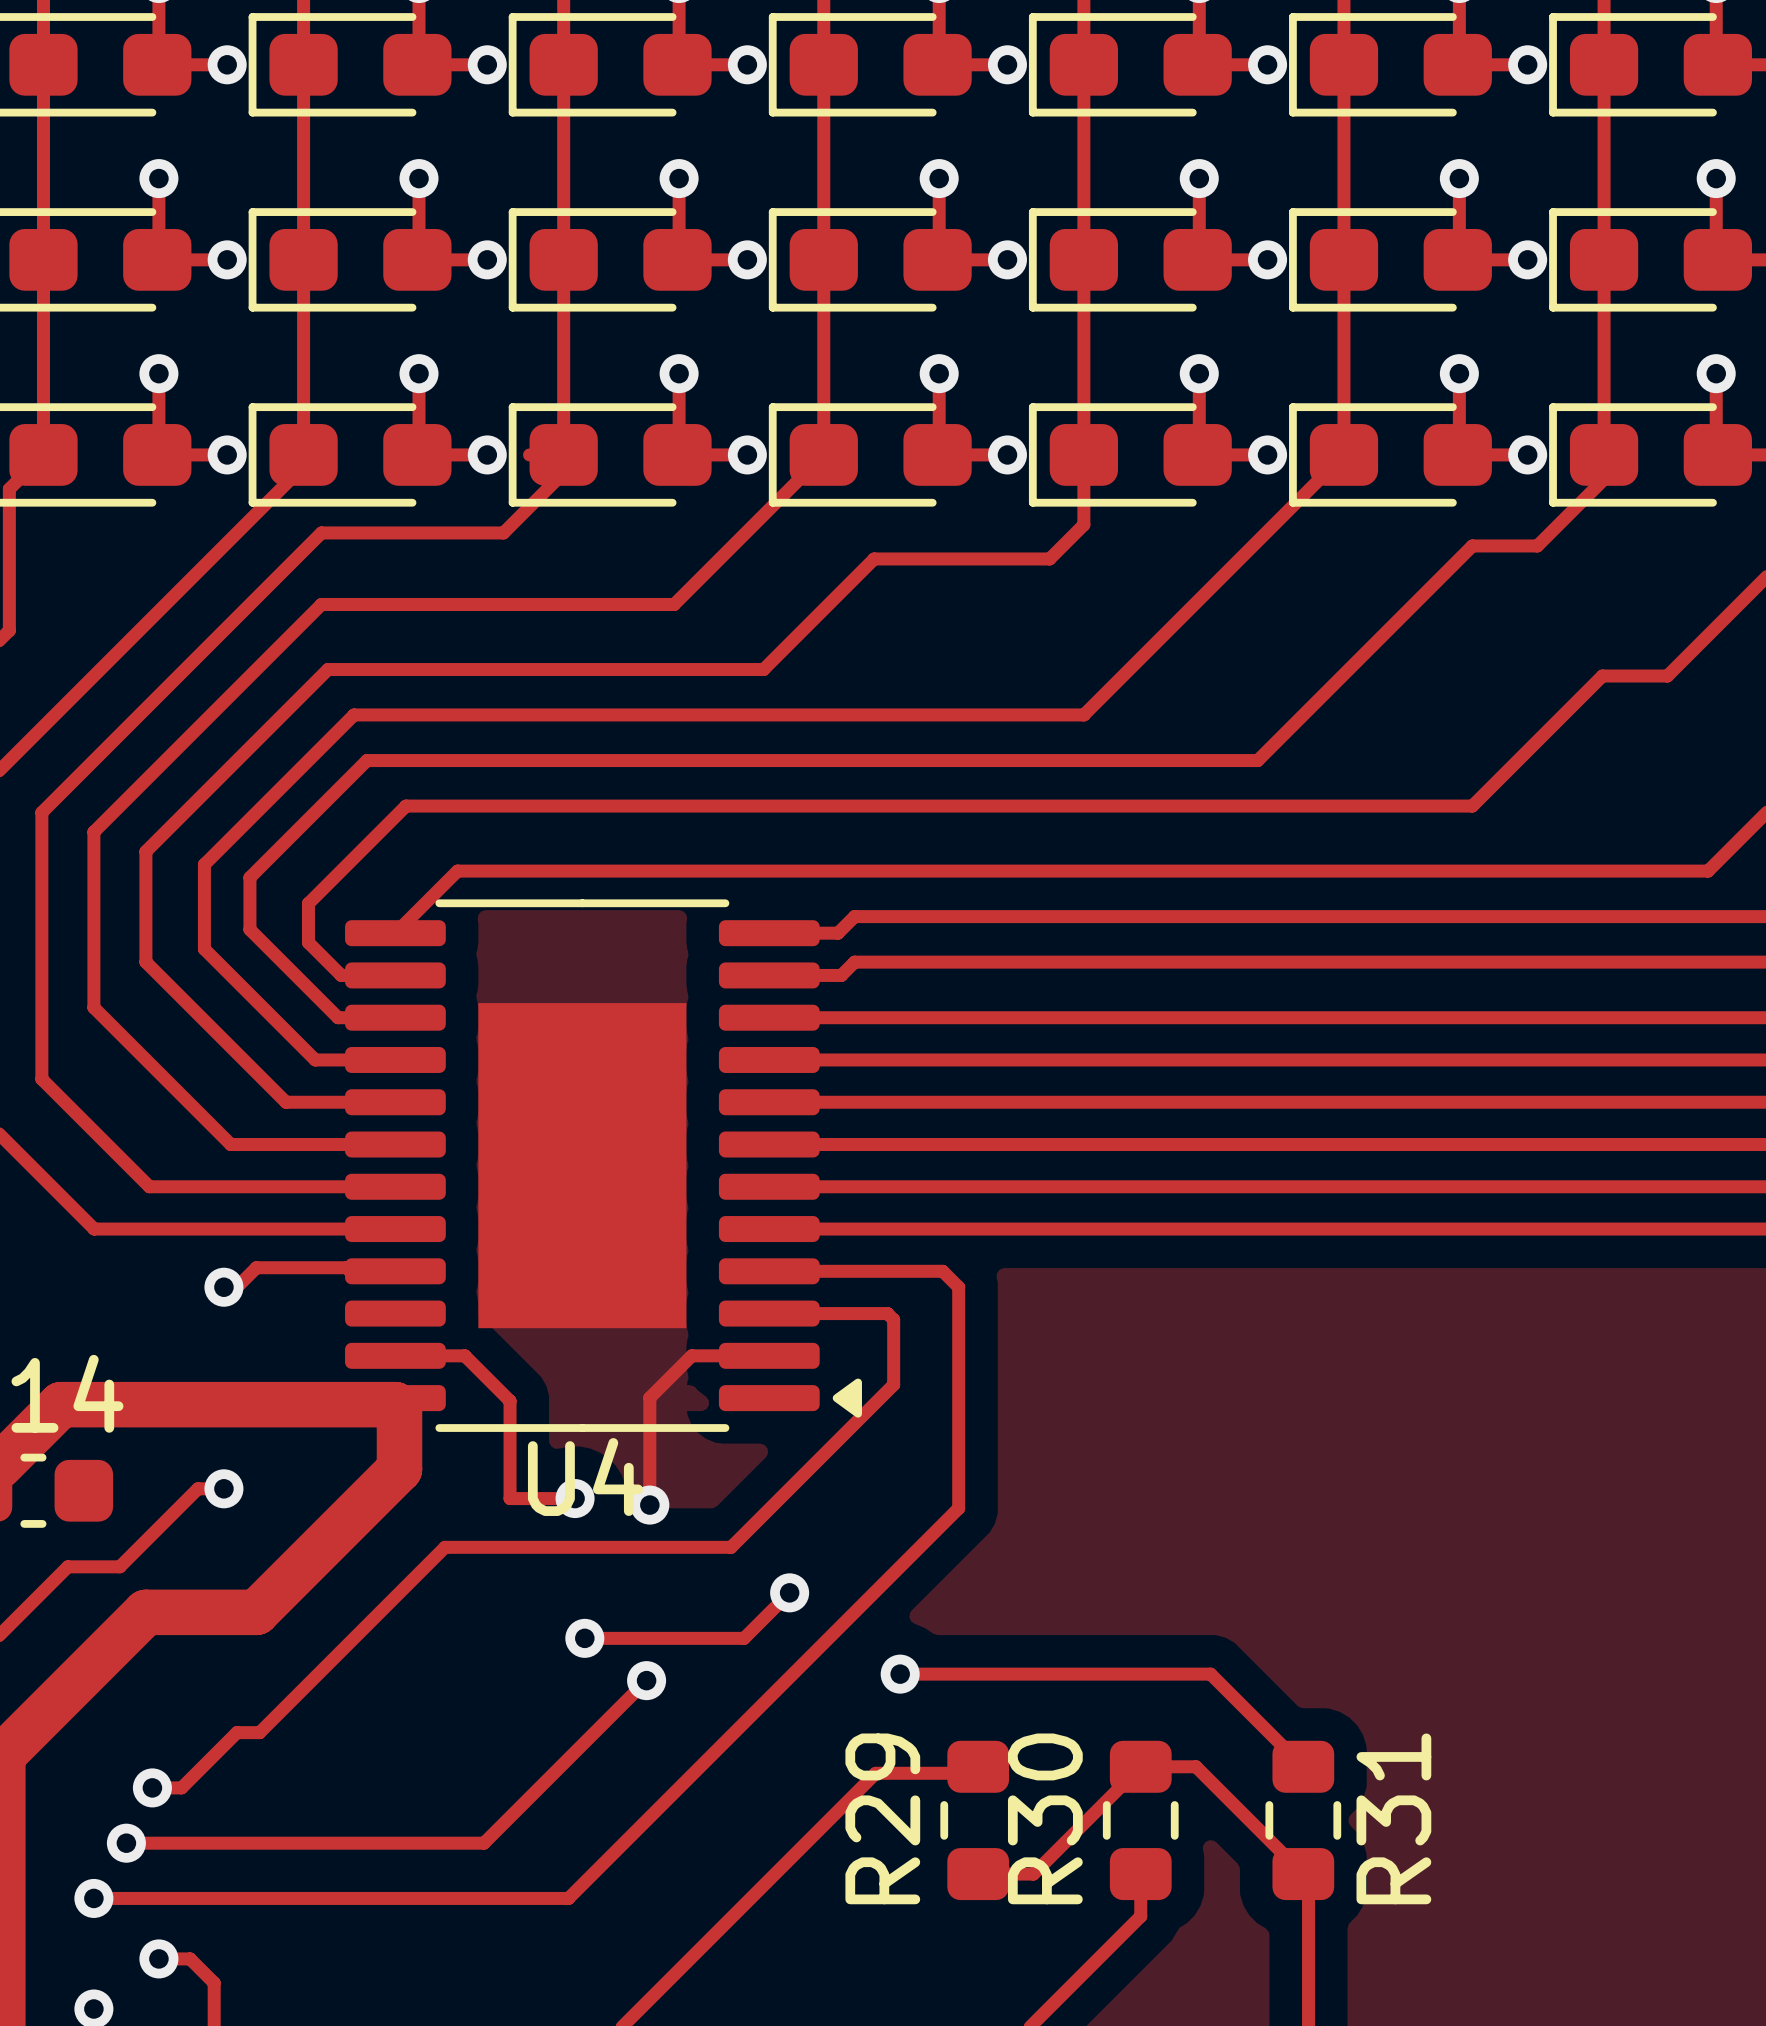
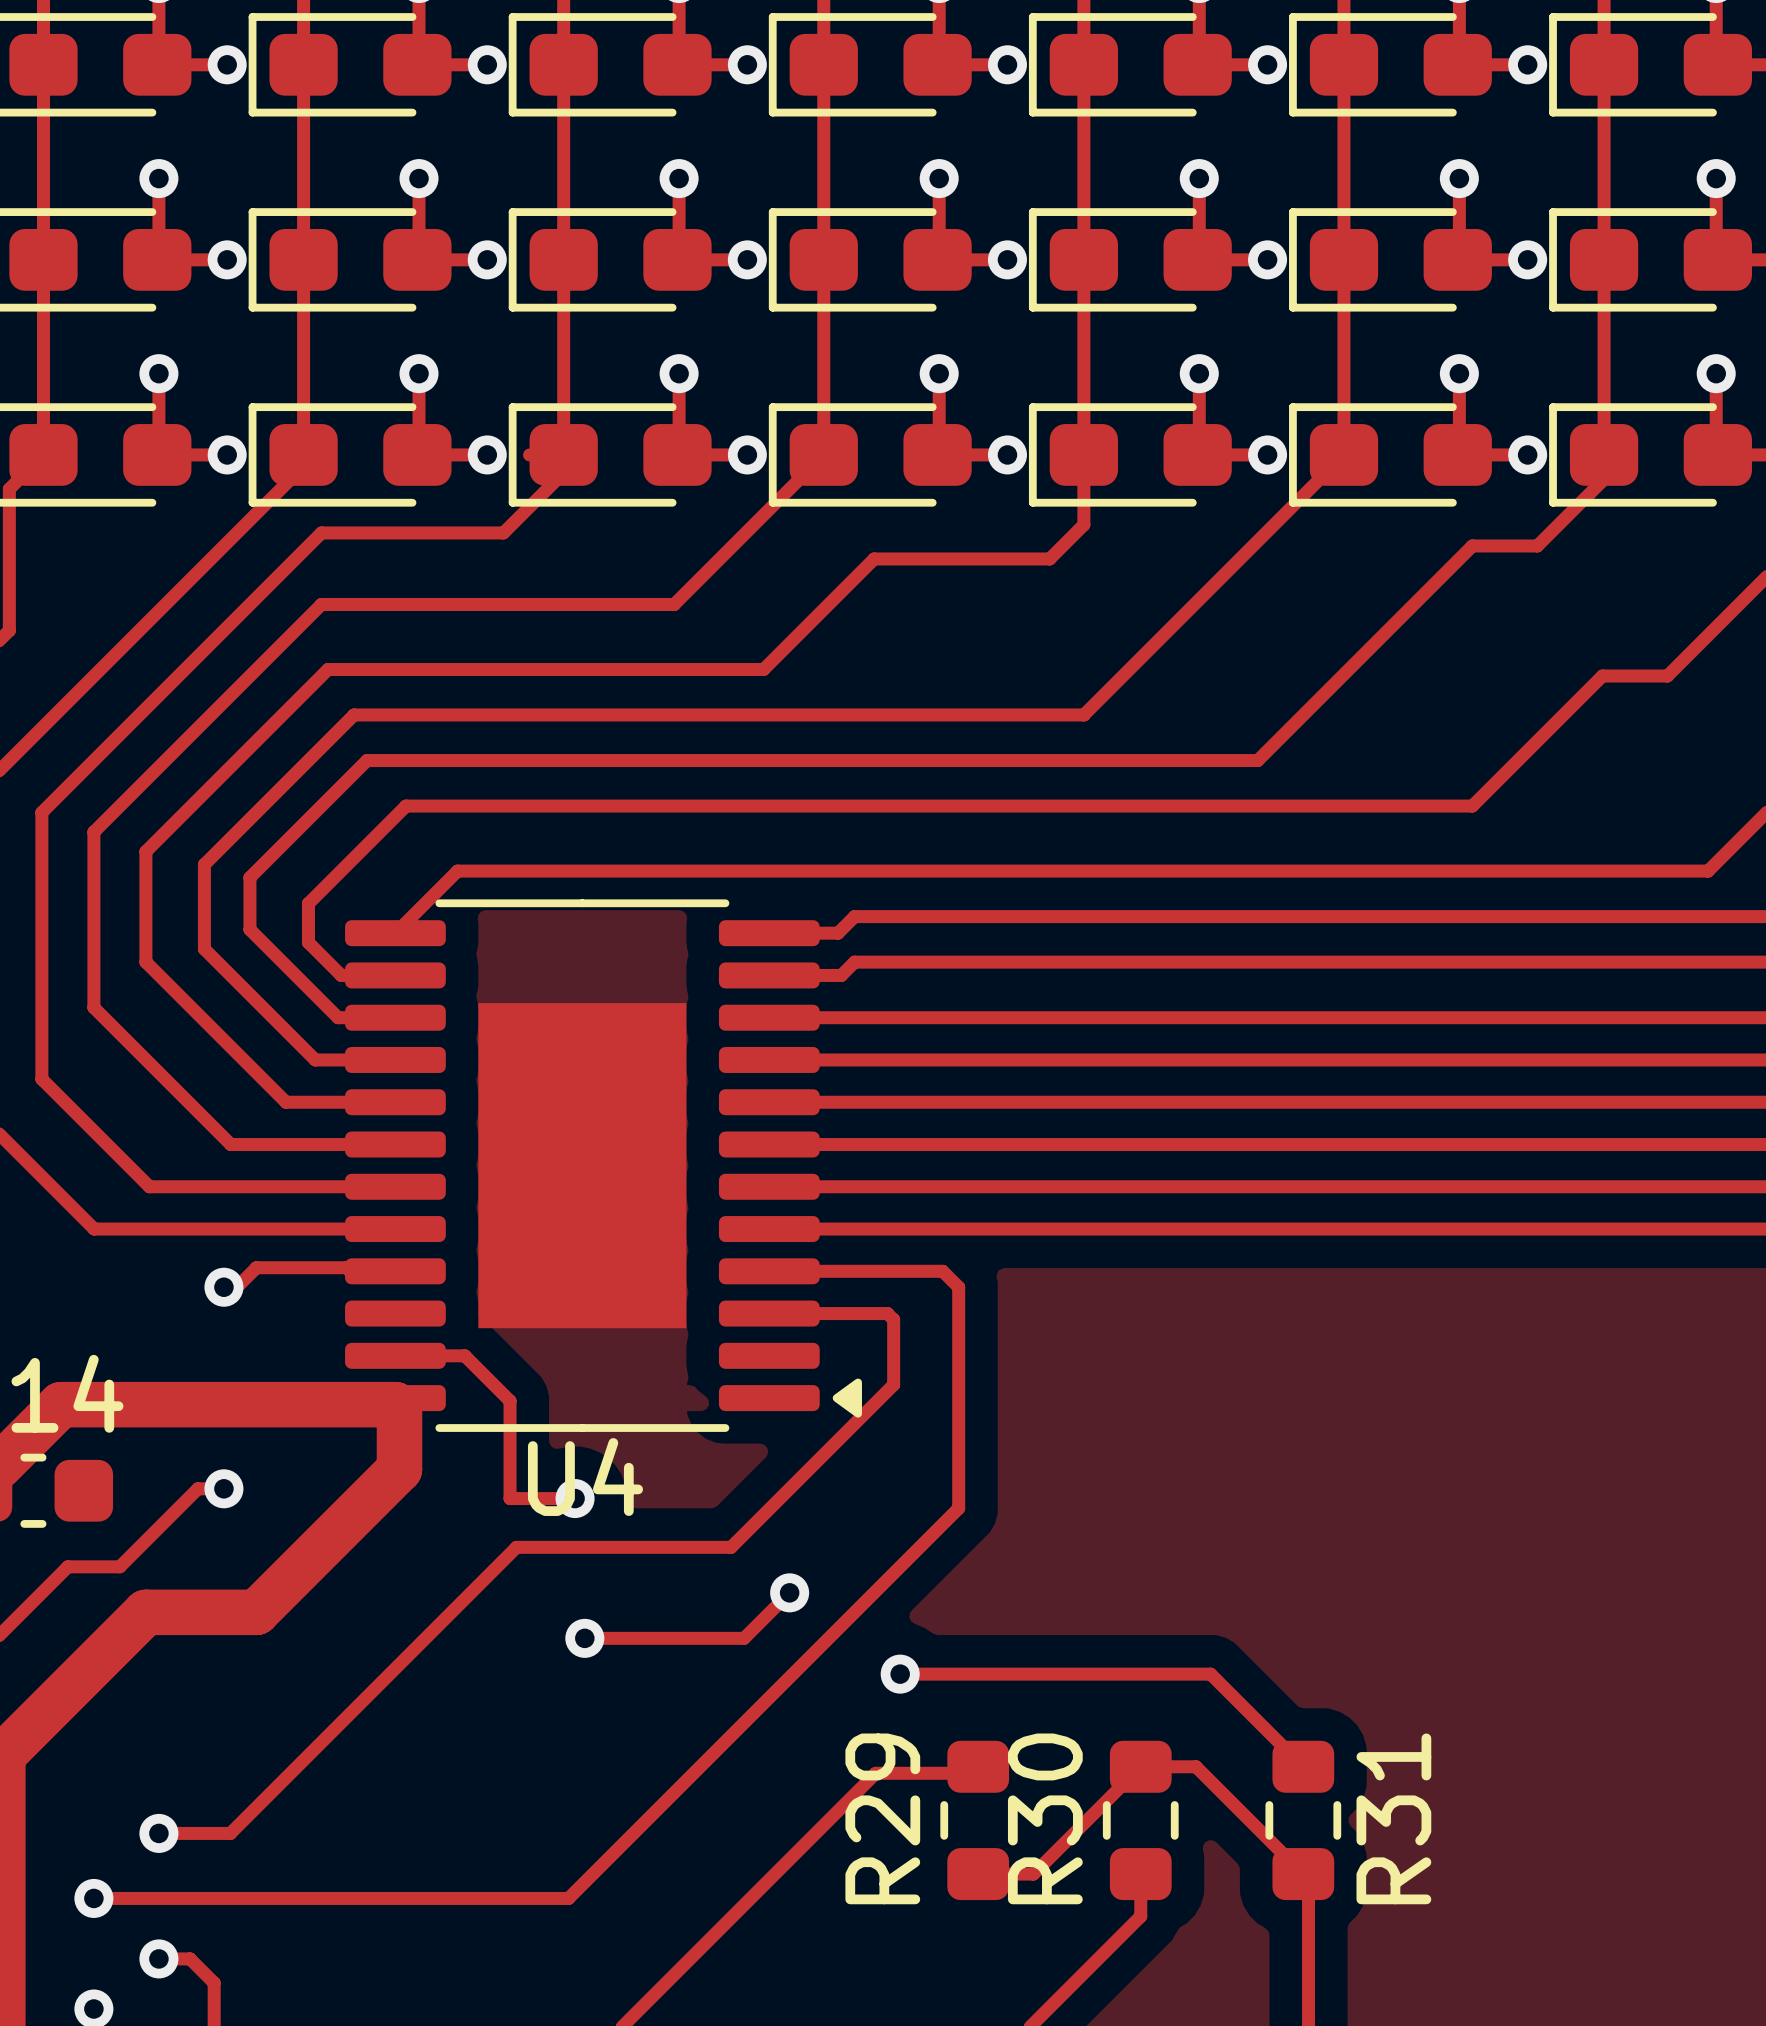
track: (769, 1355) (691, 1355) (649, 1397) (649, 1505) -> none
via: (649, 1505) -> none
track: (516, 1547) (445, 1547) (259, 1732) (236, 1732) (181, 1787) (152, 1787) -> (516, 1547) (230, 1833) (158, 1833)
track: (646, 1680) (484, 1843) (145, 1843) -> none
via: (646, 1680) -> none
via: (152, 1787) -> none
via position: (126, 1843) -> (158, 1833)

